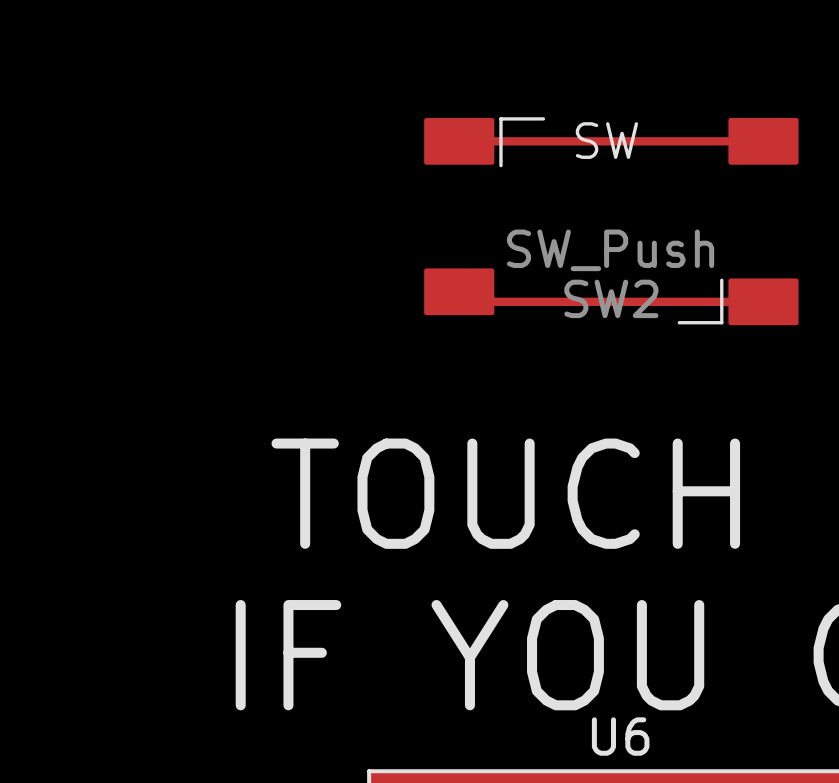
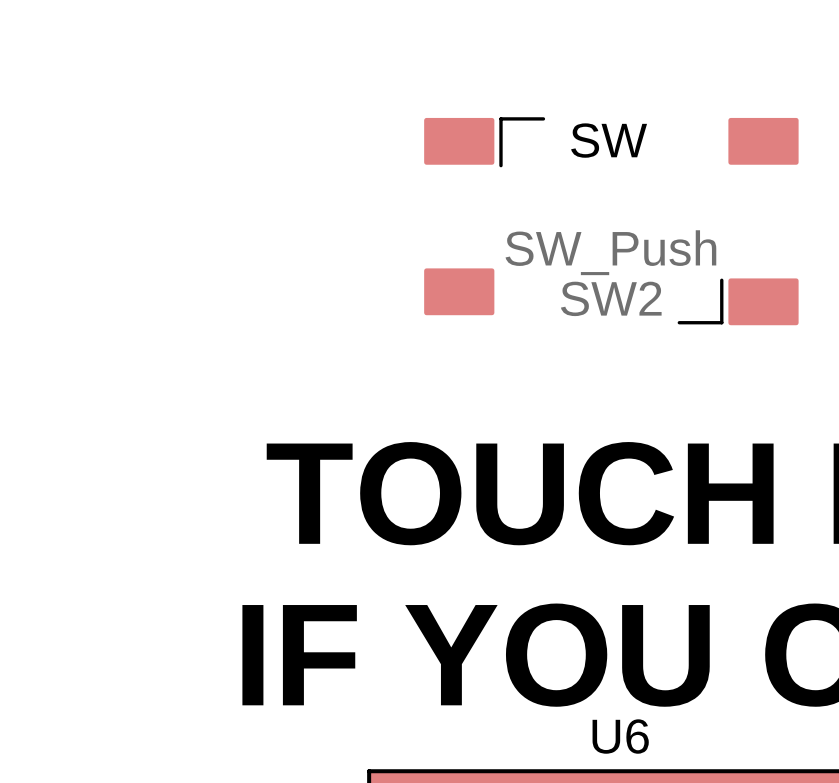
track: (459, 141) (763, 141) -> none
track: (459, 291) (469, 301) (763, 301) -> none

